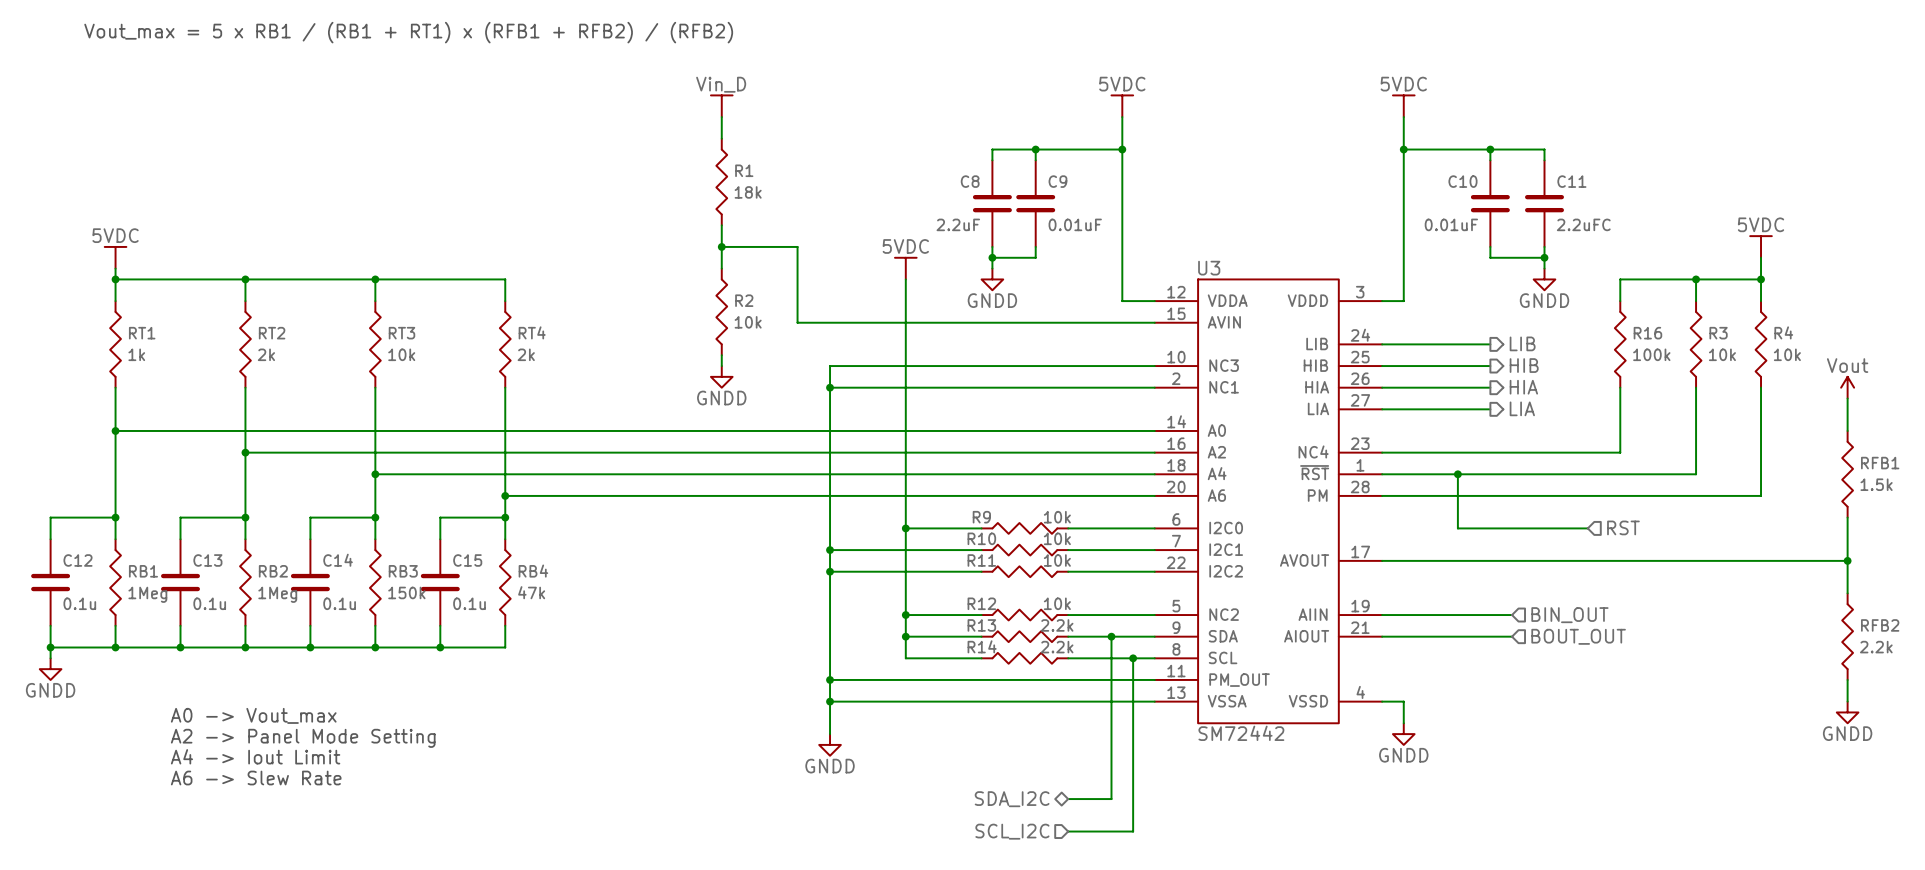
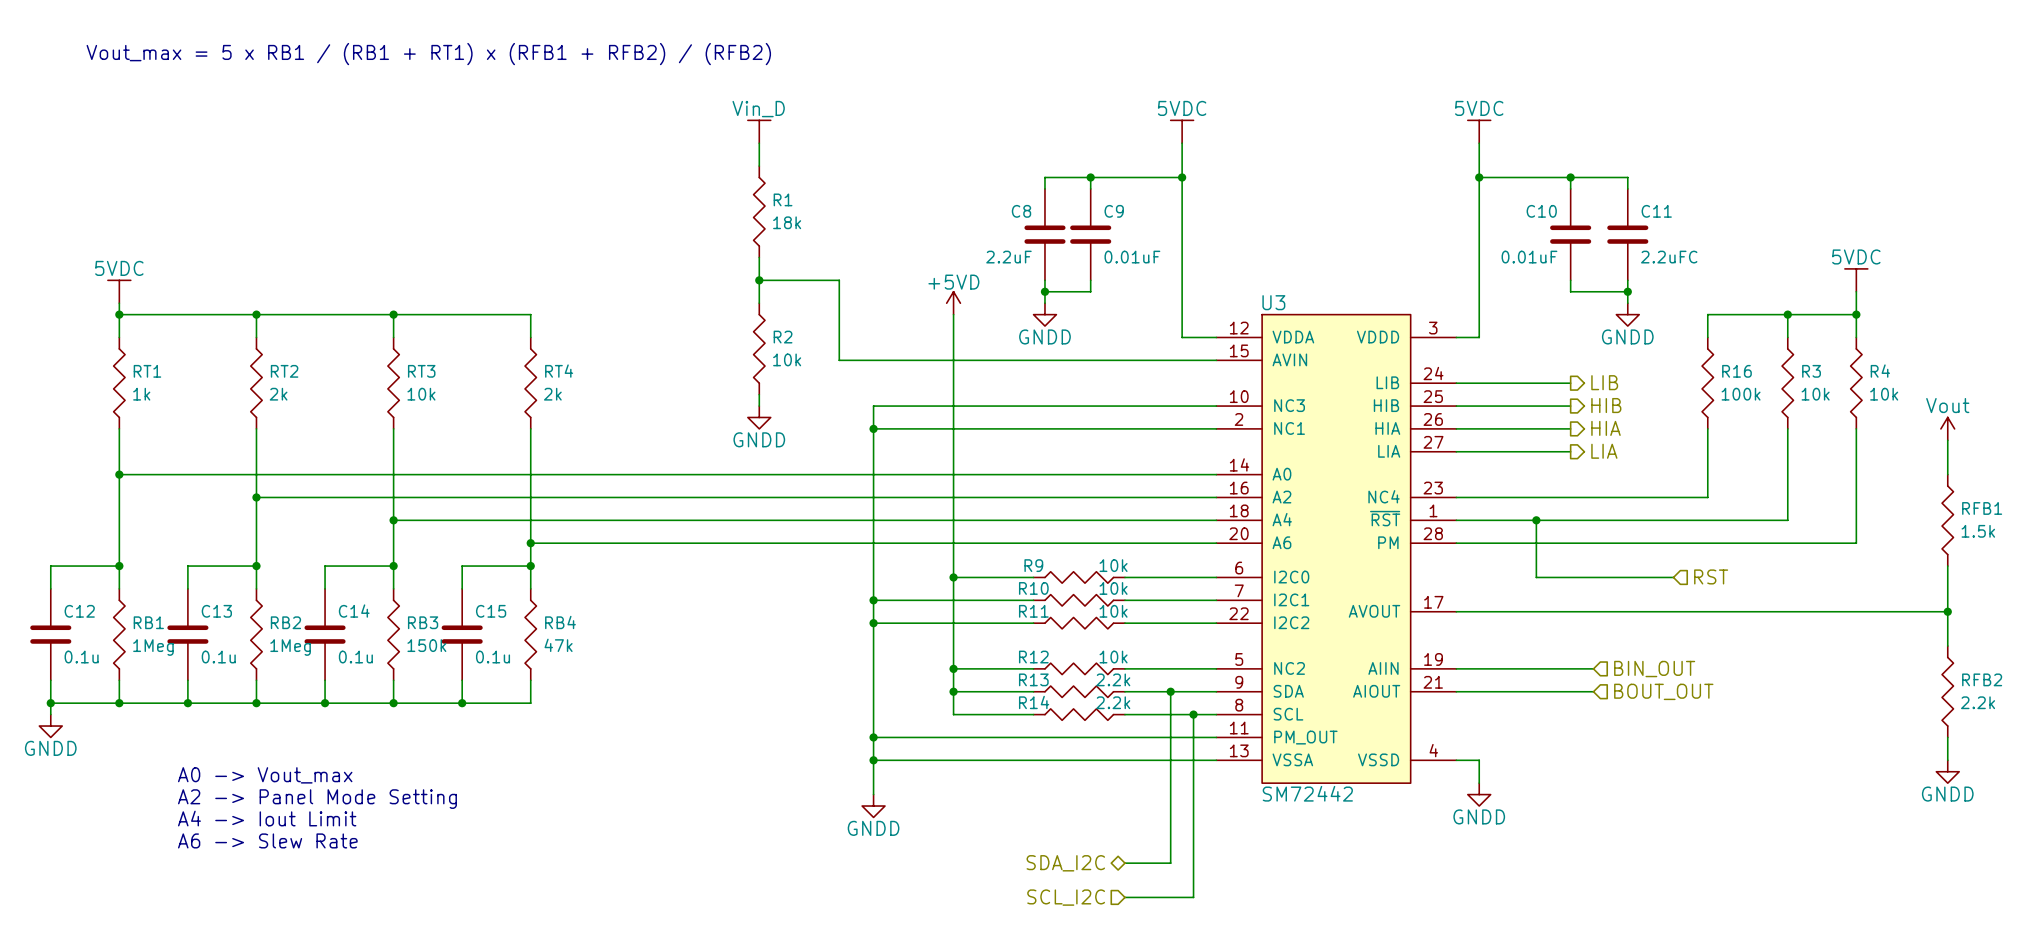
power symbol: 5VDC (905, 268) -> +5VD (953, 303)

